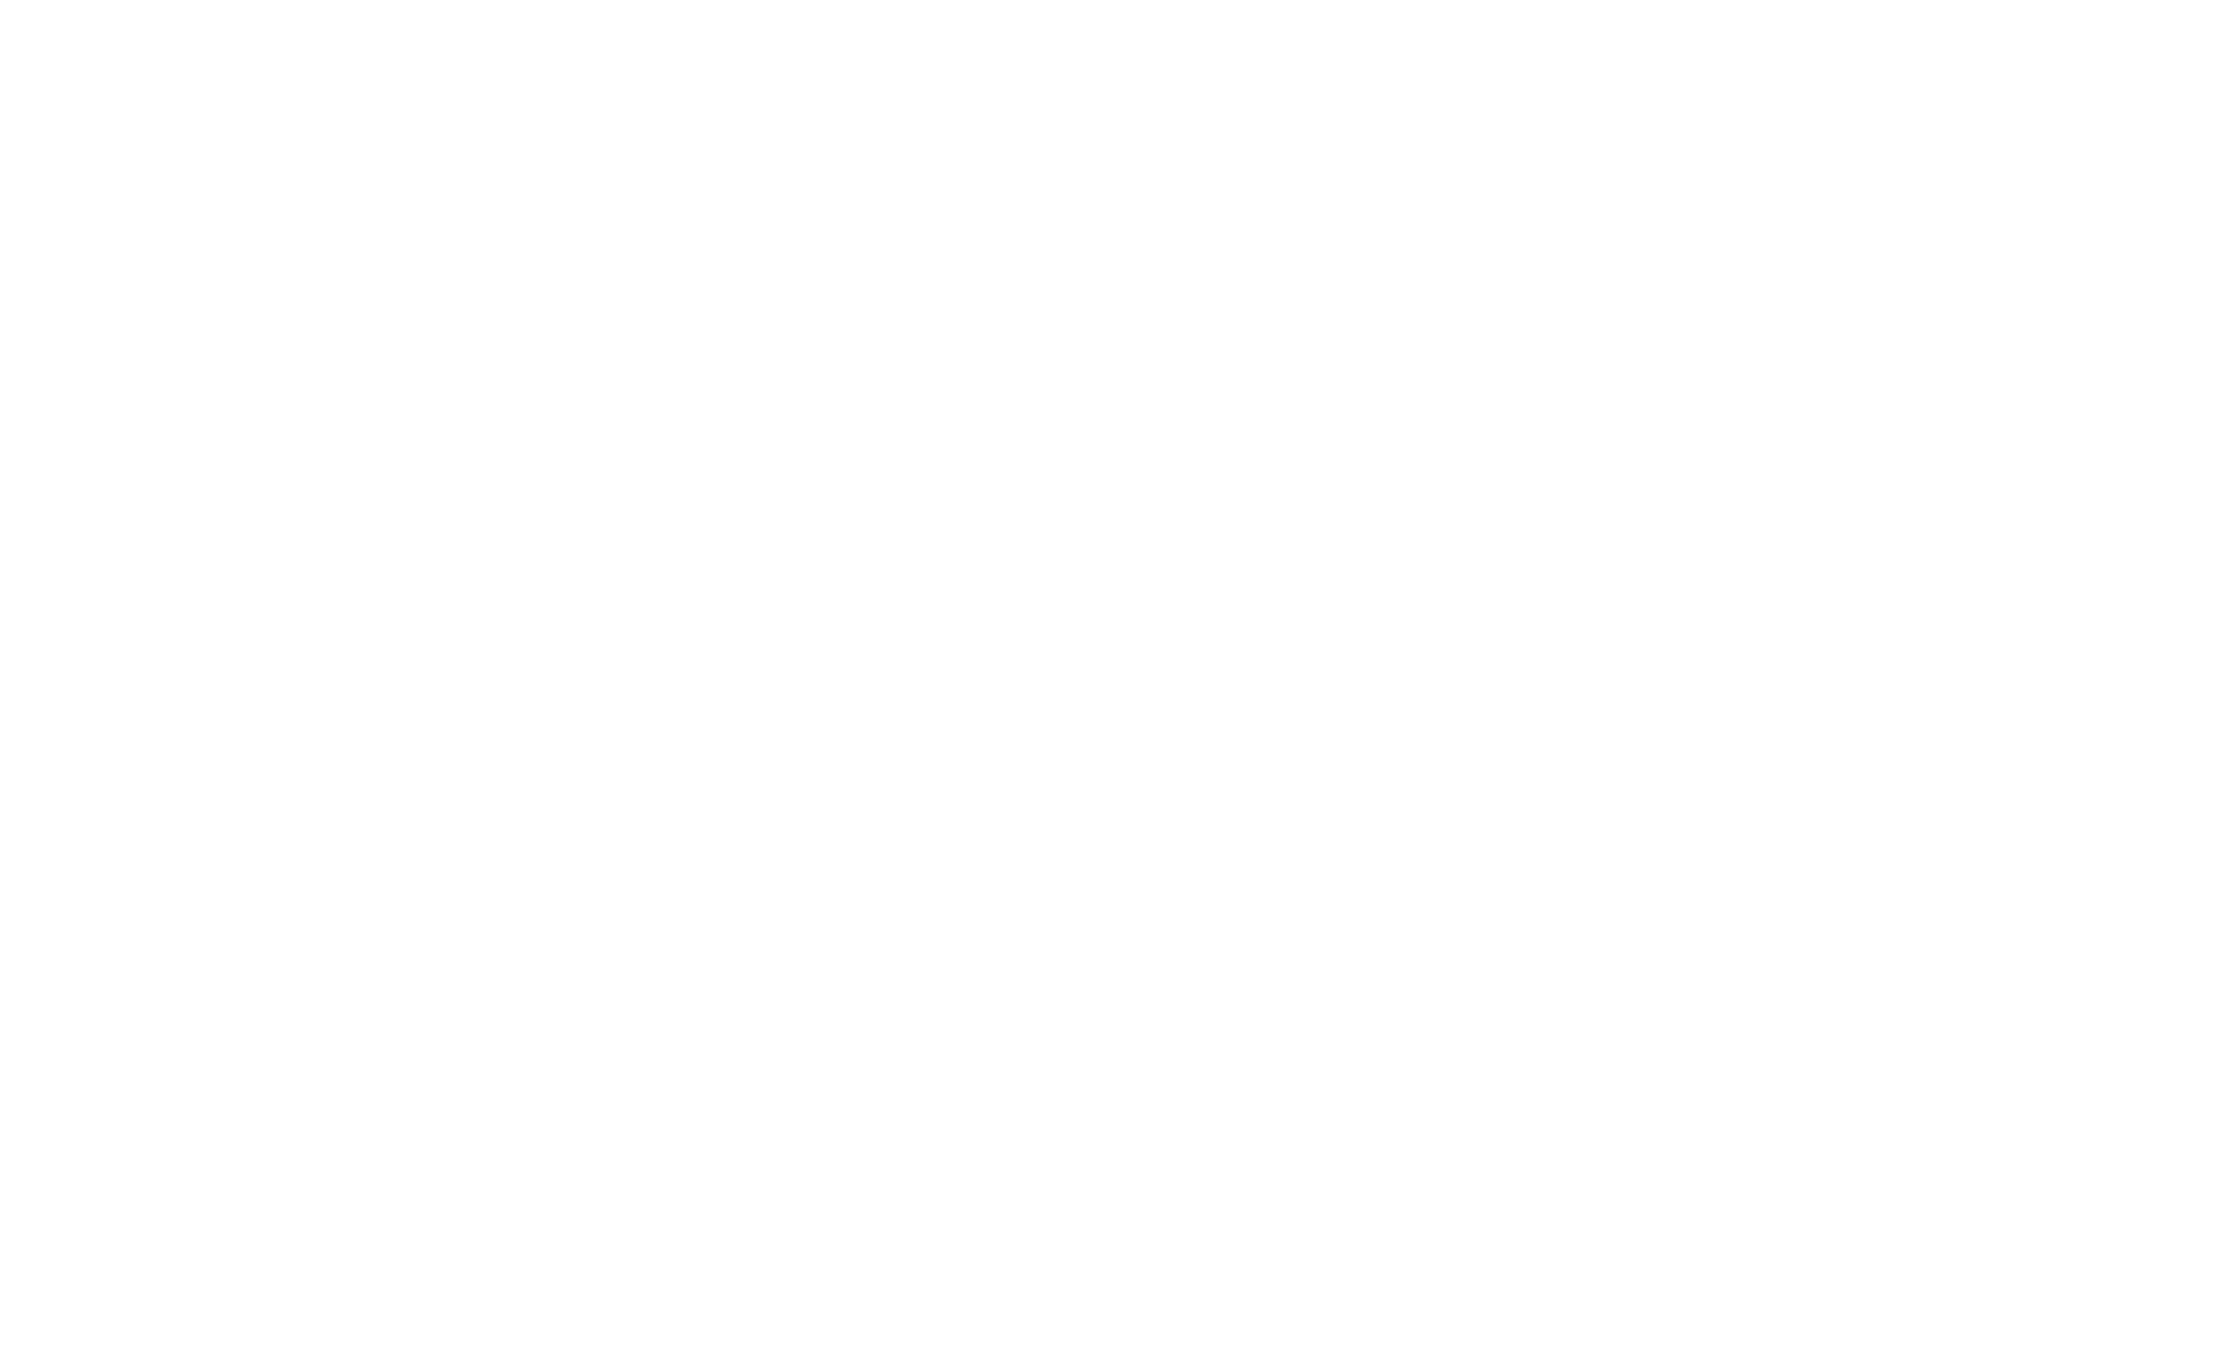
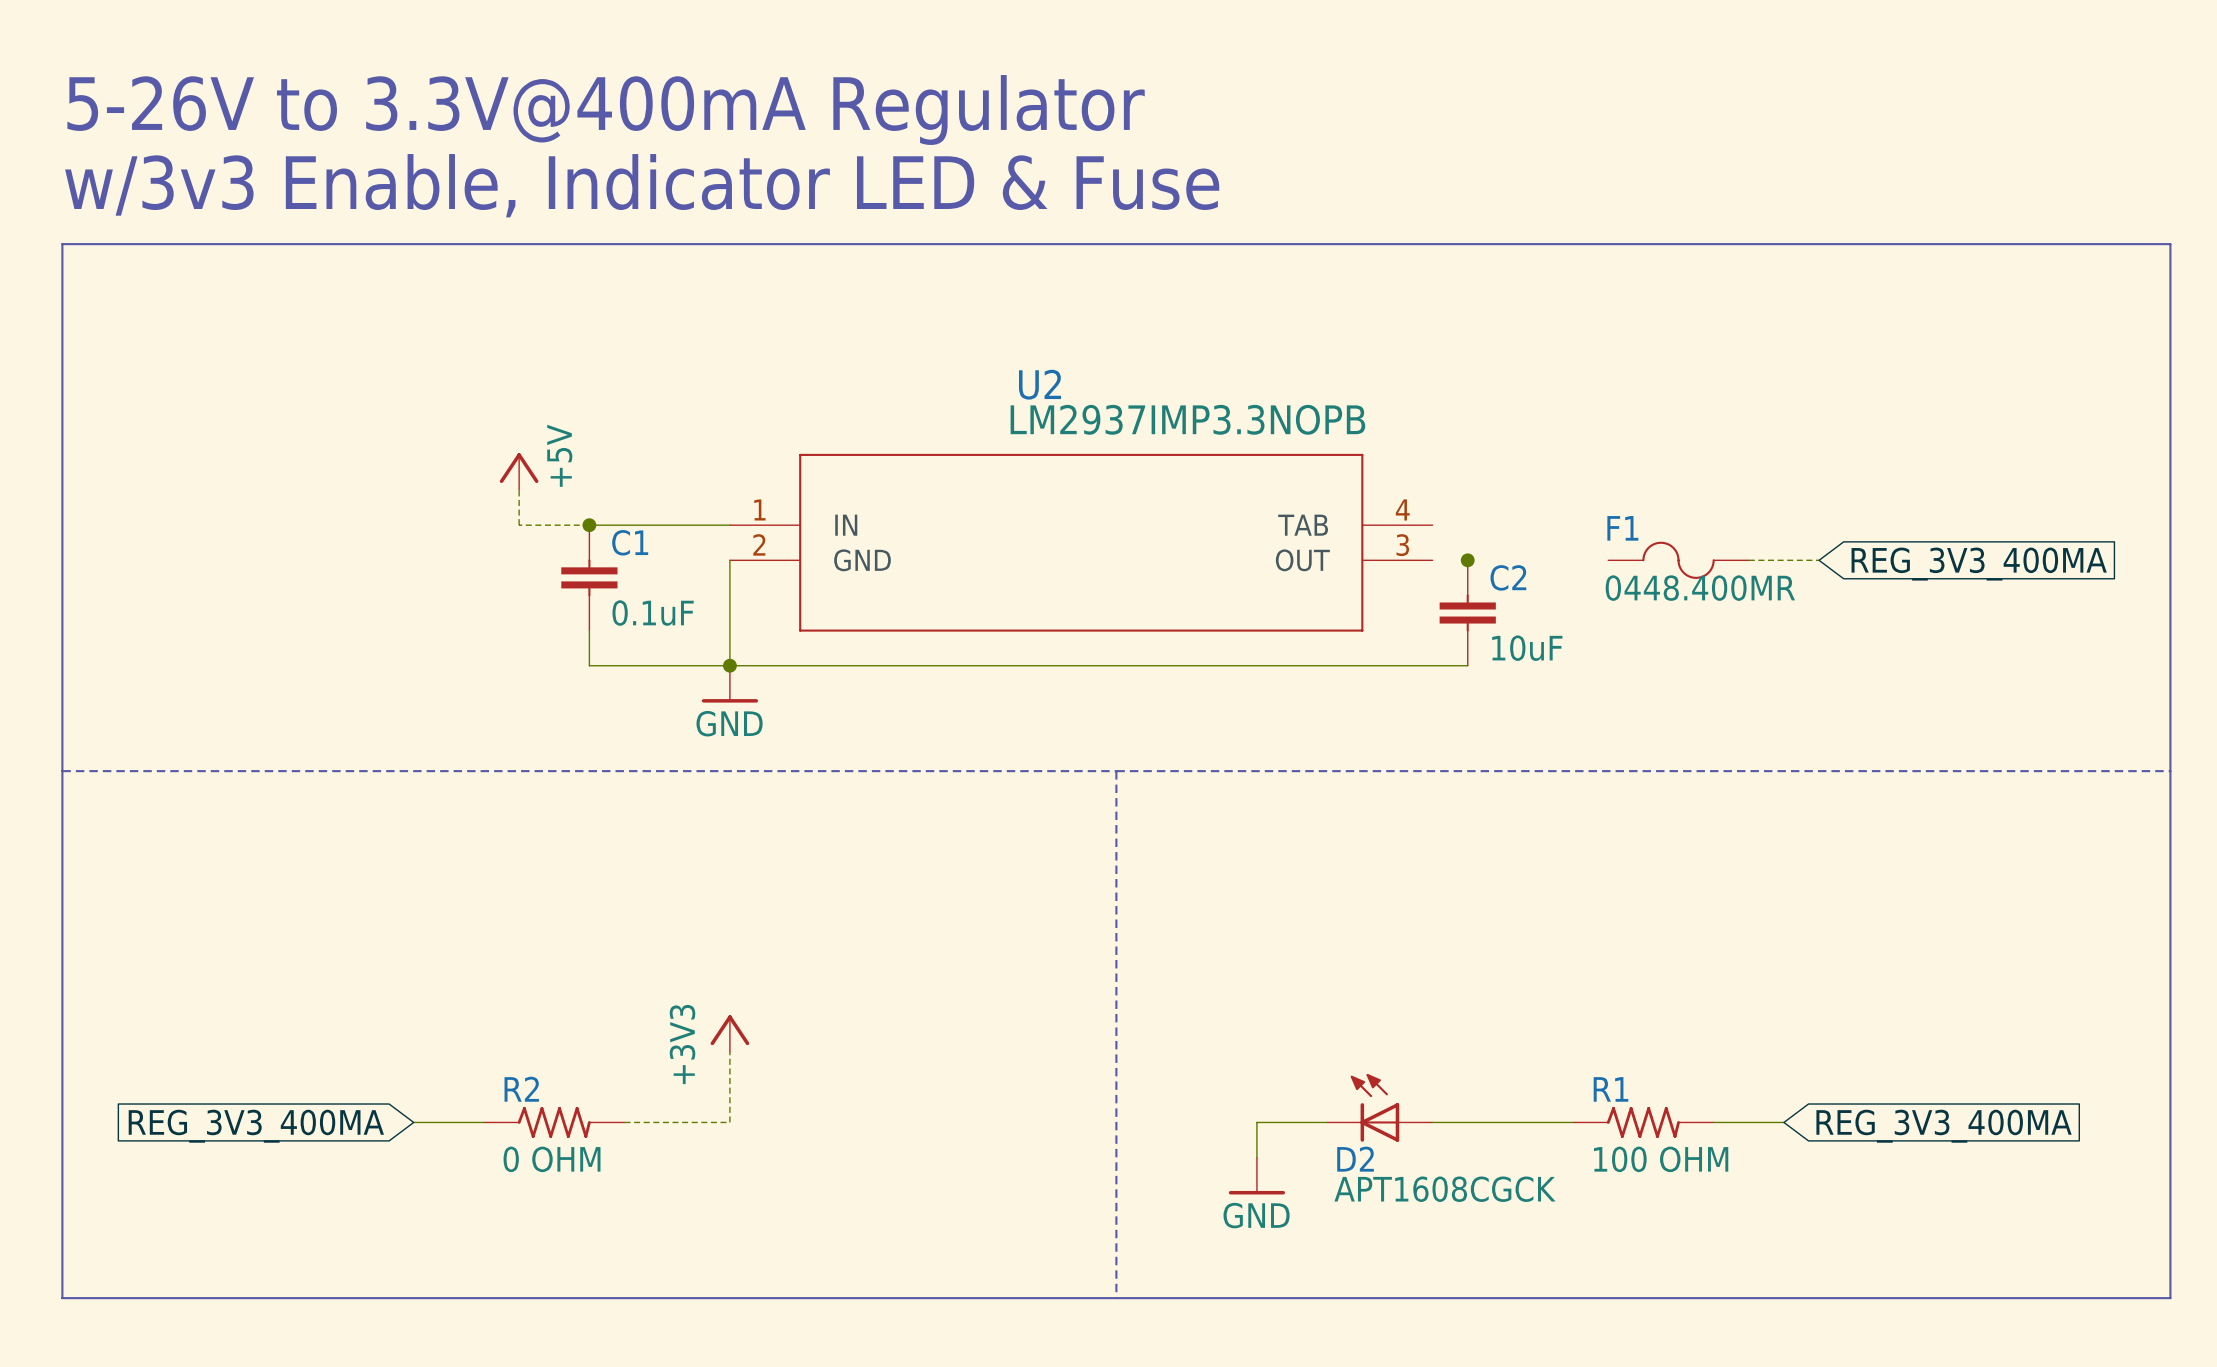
text: none -> 5-26V to 3.3V@400mA Regulator (606, 109)
text: none -> w/3v3 Enable, Indicator LED & Fuse (642, 185)
line: none -> (62, 244) (62, 1298) (2170, 1298) (2170, 244) (62, 244)
power symbol: none -> +5V (519, 471)
wire: none -> (519, 490) (519, 525) (729, 525)
junction: none -> (589, 525)
U2: none -> LM2937IMP3.3NOPB (1081, 542)
wire: none -> (729, 560) (729, 665)
junction: none -> (1467, 560)
F1: none -> 0448.400MR (1678, 560)
wire: none -> (1748, 560) (1819, 560)
global label: none -> REG_3V3_400MA (1979, 564)
C1: none -> 0.1uF (589, 577)
C2: none -> 10uF (1467, 613)
wire: none -> (589, 630) (589, 665) (1467, 665)
junction: none -> (729, 665)
power symbol: none -> GND (729, 684)
line: none -> (62, 771) (2170, 771)
line: none -> (1116, 771) (1116, 1298)
power symbol: none -> +3V3 (729, 1033)
wire: none -> (729, 1052) (729, 1122) (624, 1122)
D2: none -> APT1608CGCK (1379, 1107)
wire: none -> (413, 1122) (483, 1122)
R2: none -> 0 OHM (554, 1122)
wire: none -> (1327, 1122) (1256, 1122) (1256, 1157)
wire: none -> (1432, 1122) (1573, 1122)
R1: none -> 100 OHM (1643, 1122)
wire: none -> (1713, 1122) (1783, 1122)
global label: none -> REG_3V3_400MA (256, 1126)
global label: none -> REG_3V3_400MA (1944, 1126)
power symbol: none -> GND (1256, 1176)

